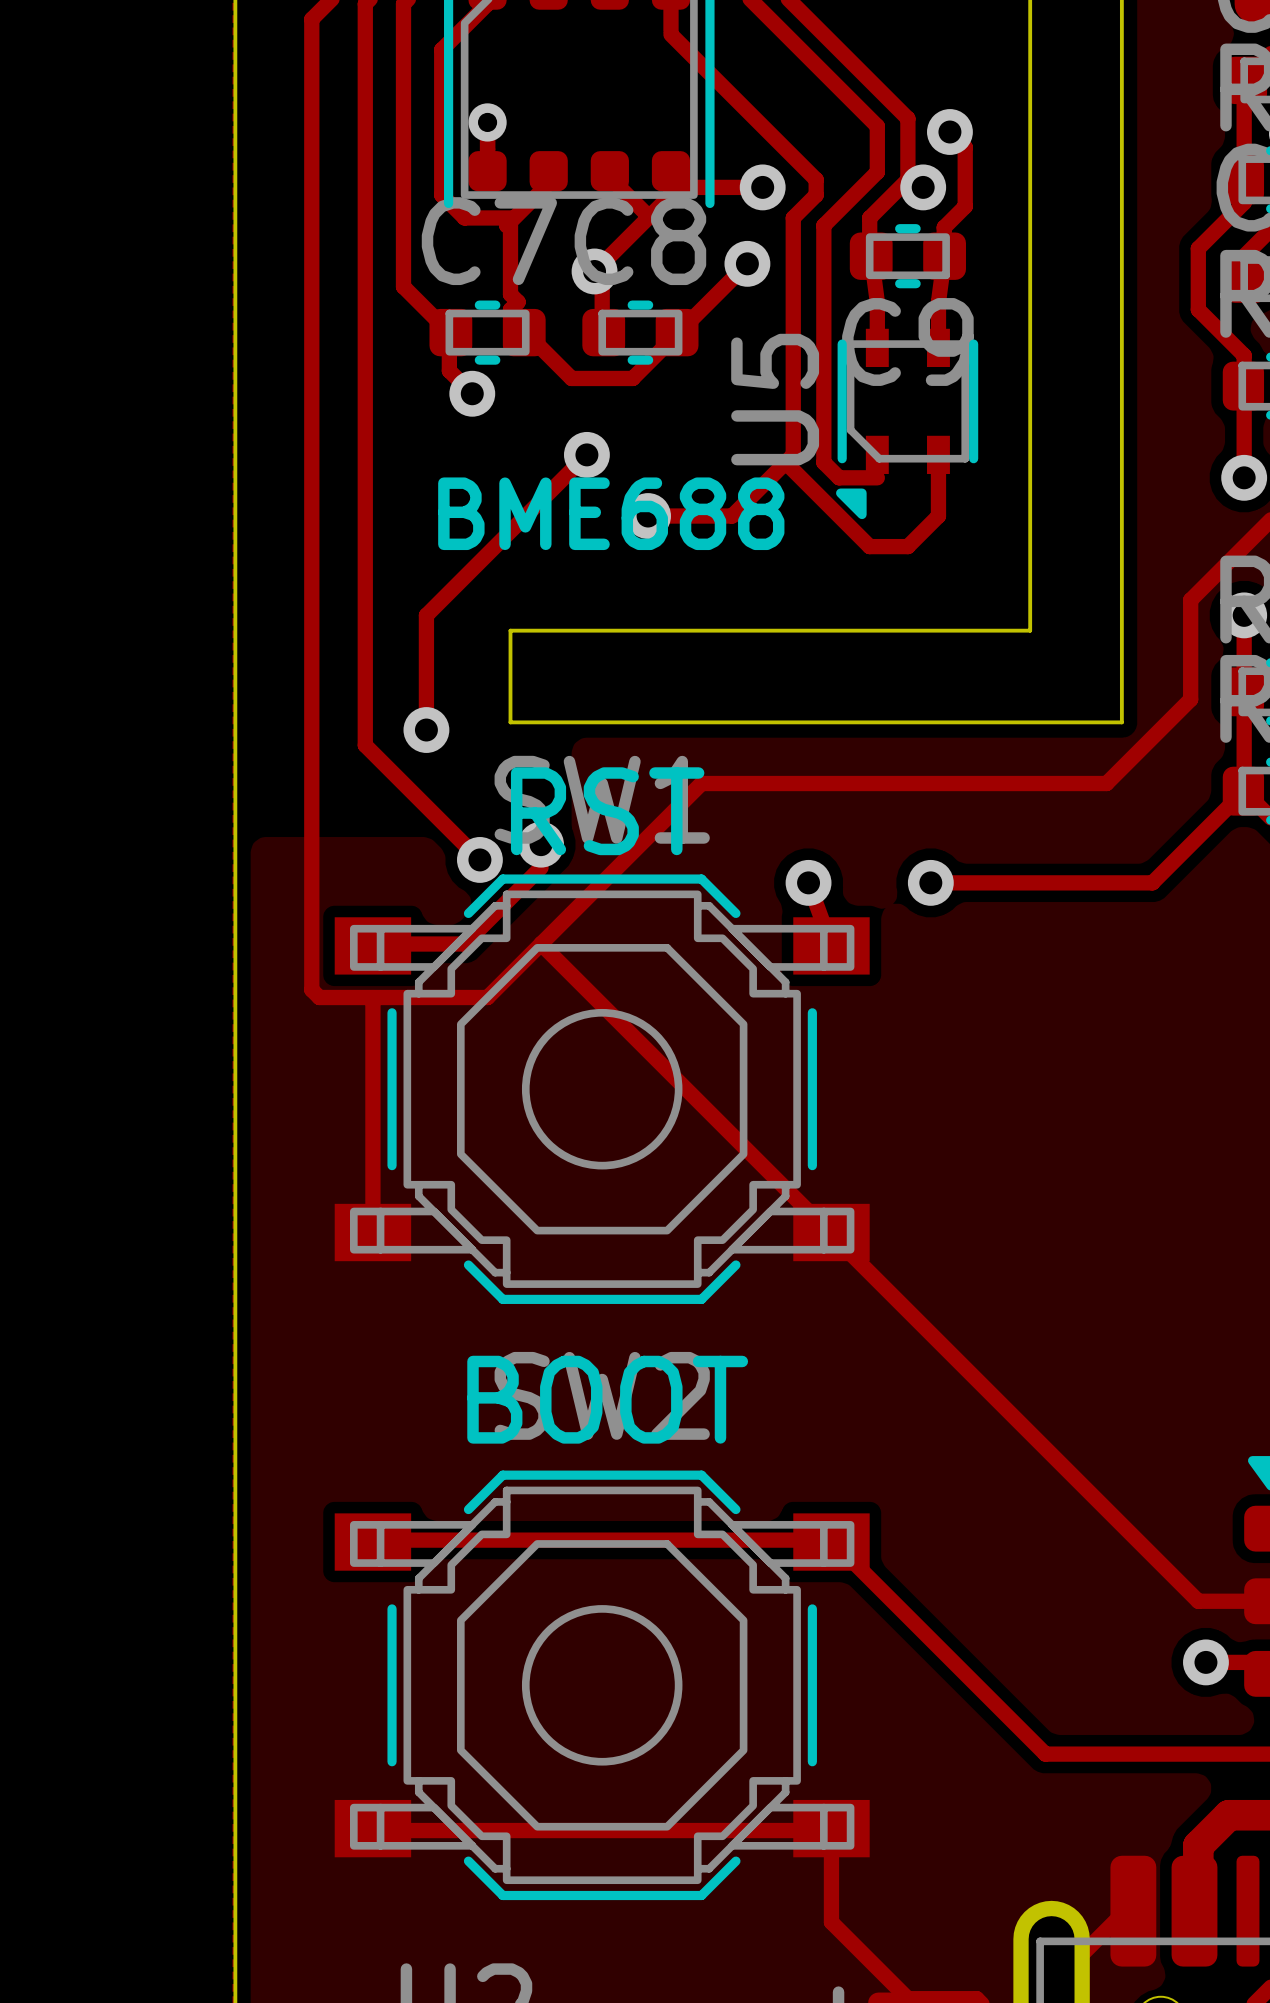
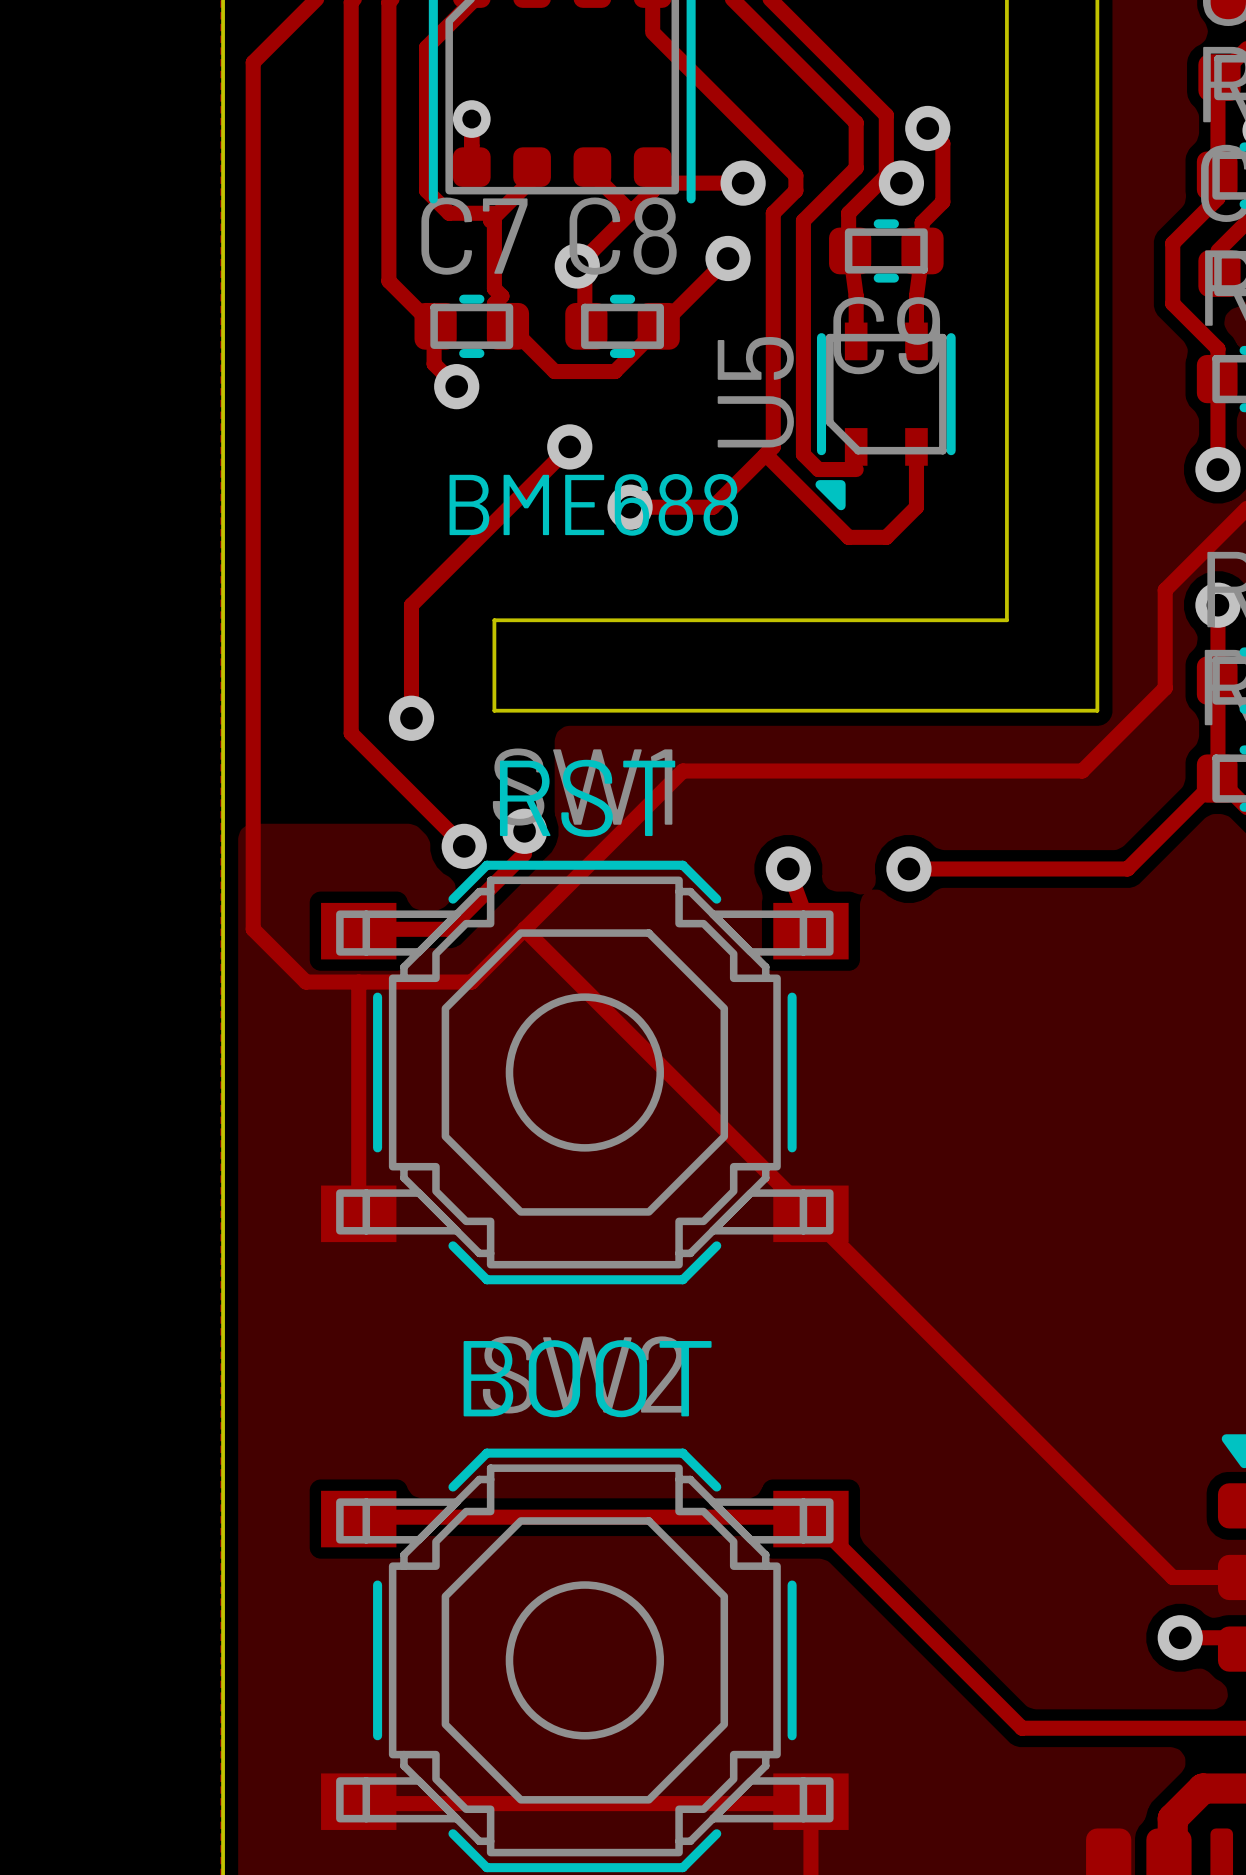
track: (311, 19) (311, 989) -> (298, 17) (253, 62) (253, 929) (298, 974)

